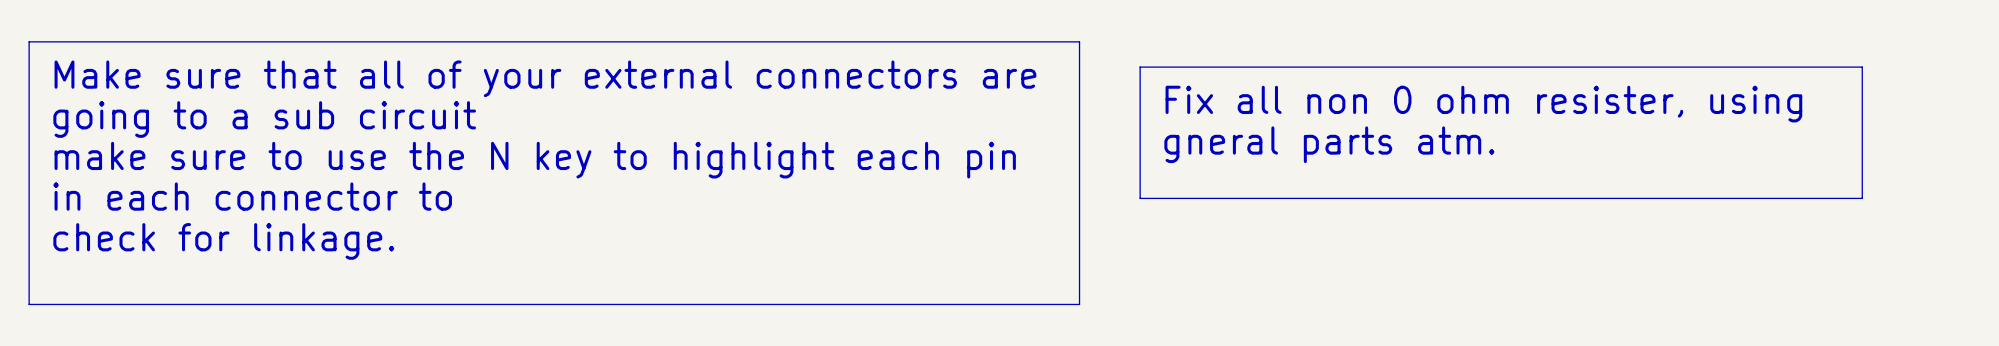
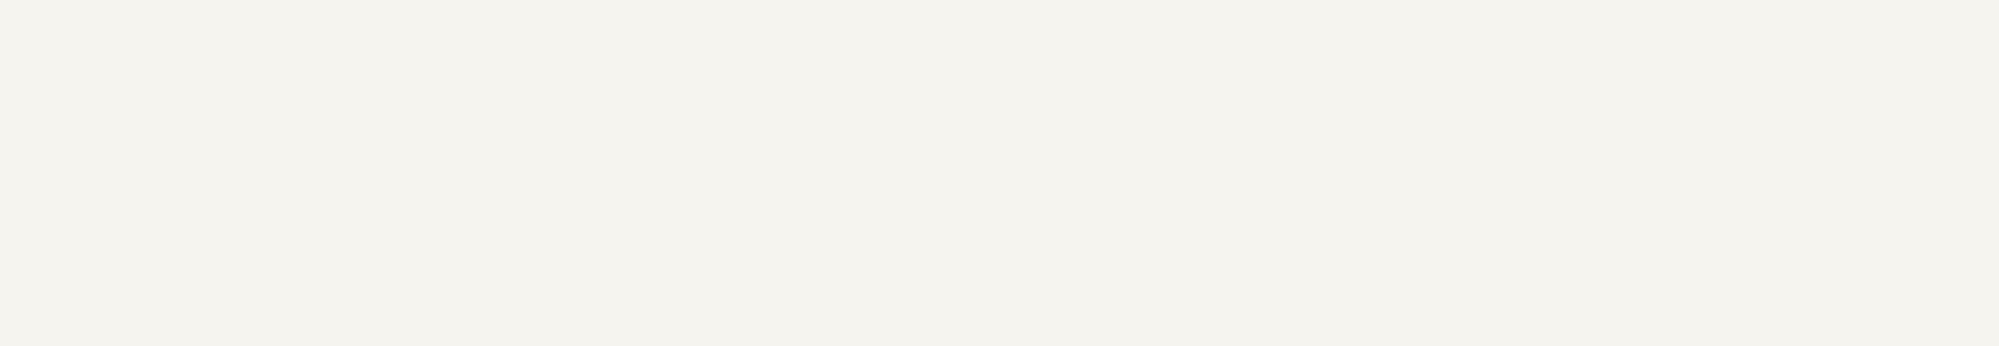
line: (29, 41) (1079, 41) (1079, 304) (29, 304) (29, 41) -> none
line: (1140, 67) (1862, 67) (1862, 198) (1140, 198) (1140, 67) -> none
text: Make sure that all of your external connectors are (545, 78) -> none
text: Fix all non 0 ohm resister, using (1483, 104) -> none
text: going to a sub circuit (264, 119) -> none
text: gneral parts atm. (1329, 144) -> none
text: make sure to use the N key to highlight each pin (535, 160) -> none
text: in each connector to (252, 196) -> none
text: check for linkage. (223, 241) -> none

